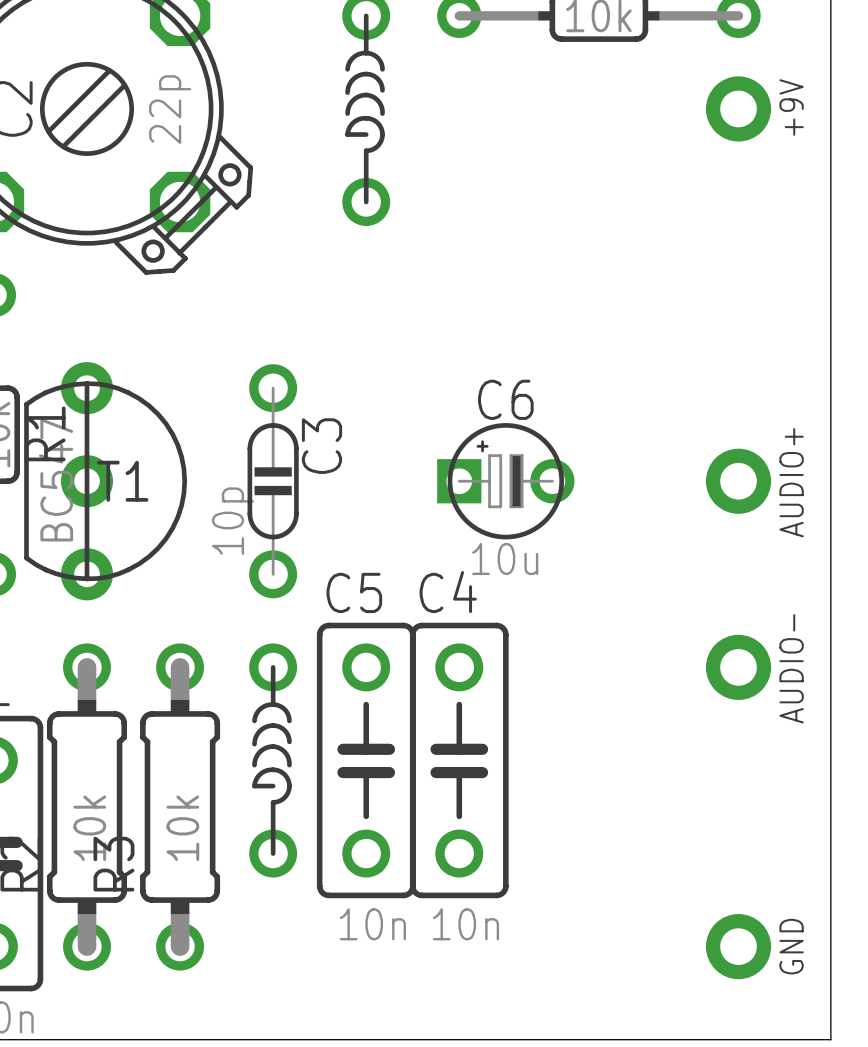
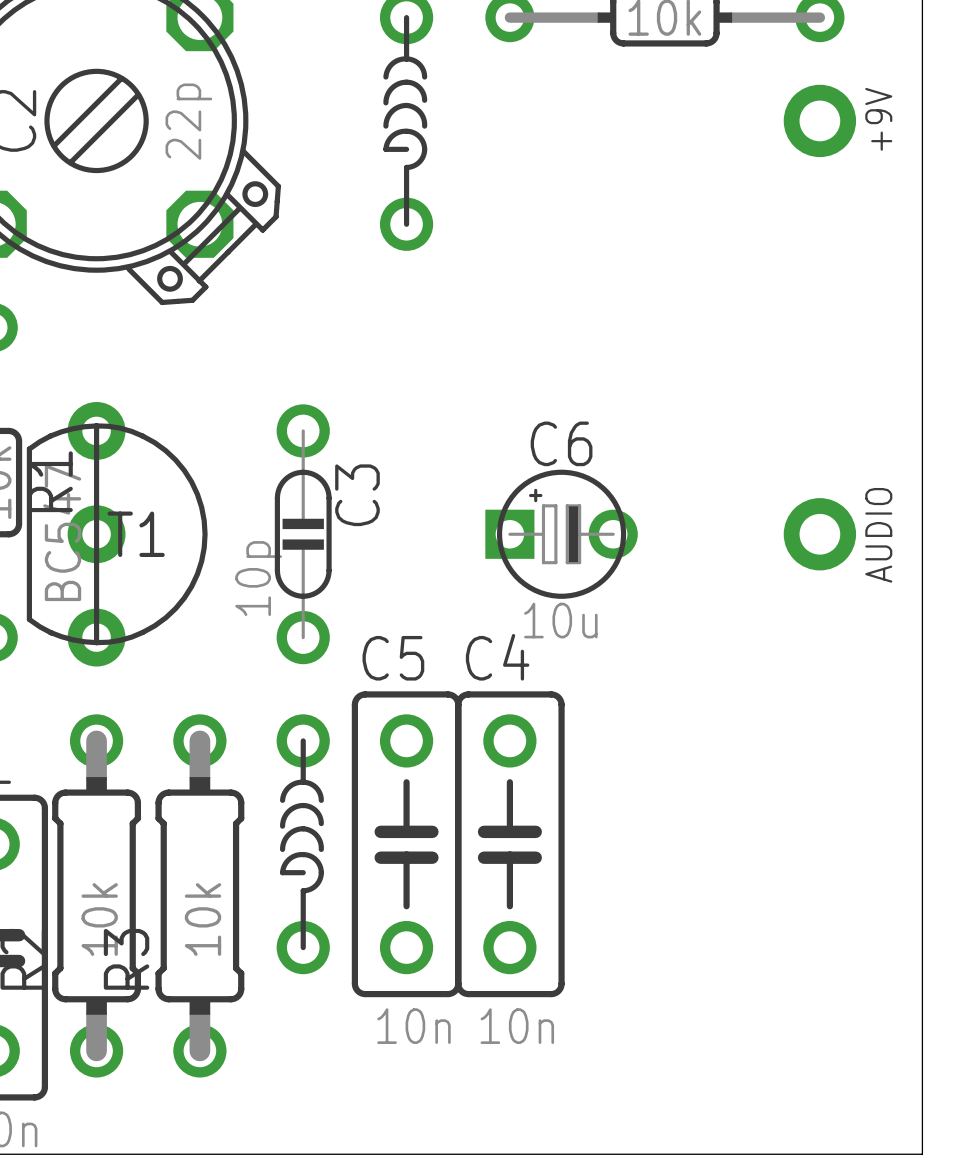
AUDIO+ name: AUDIO+ (791, 482) -> AUDIO (878, 535)
AUDIO-: (738, 667) -> none
GND: (738, 946) -> none

